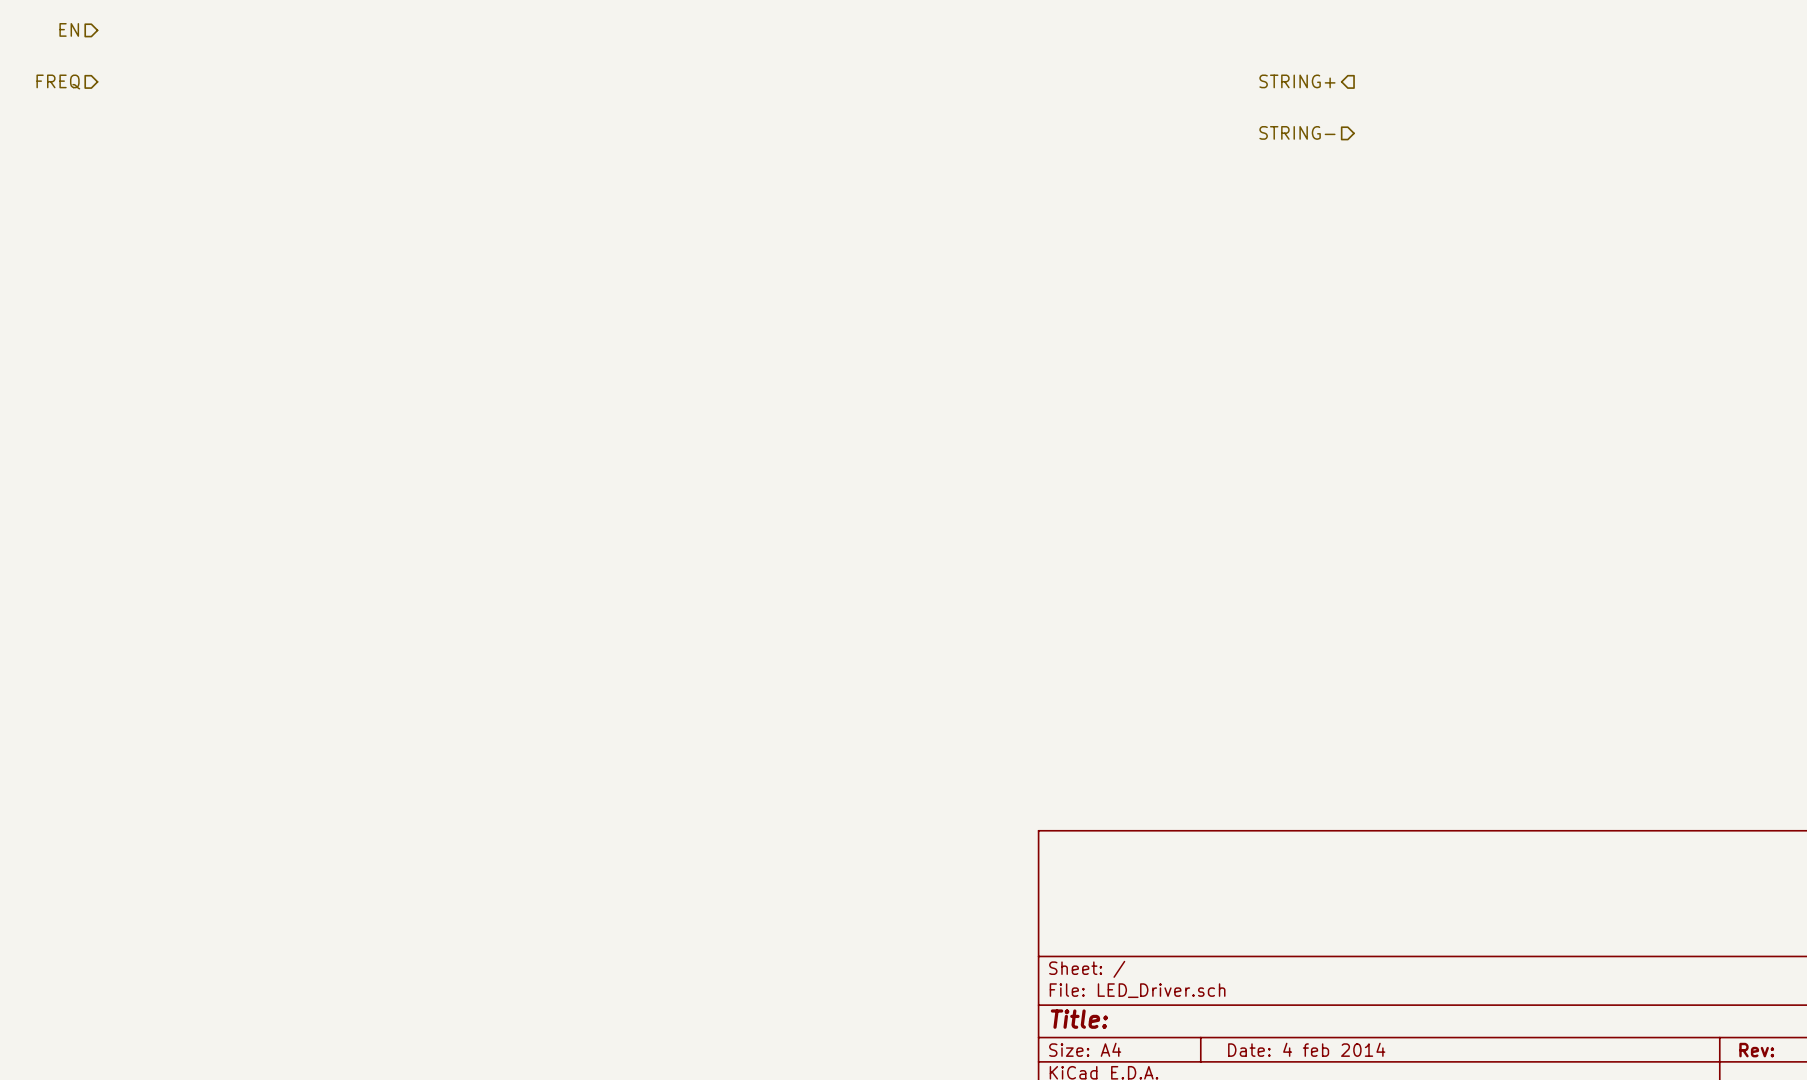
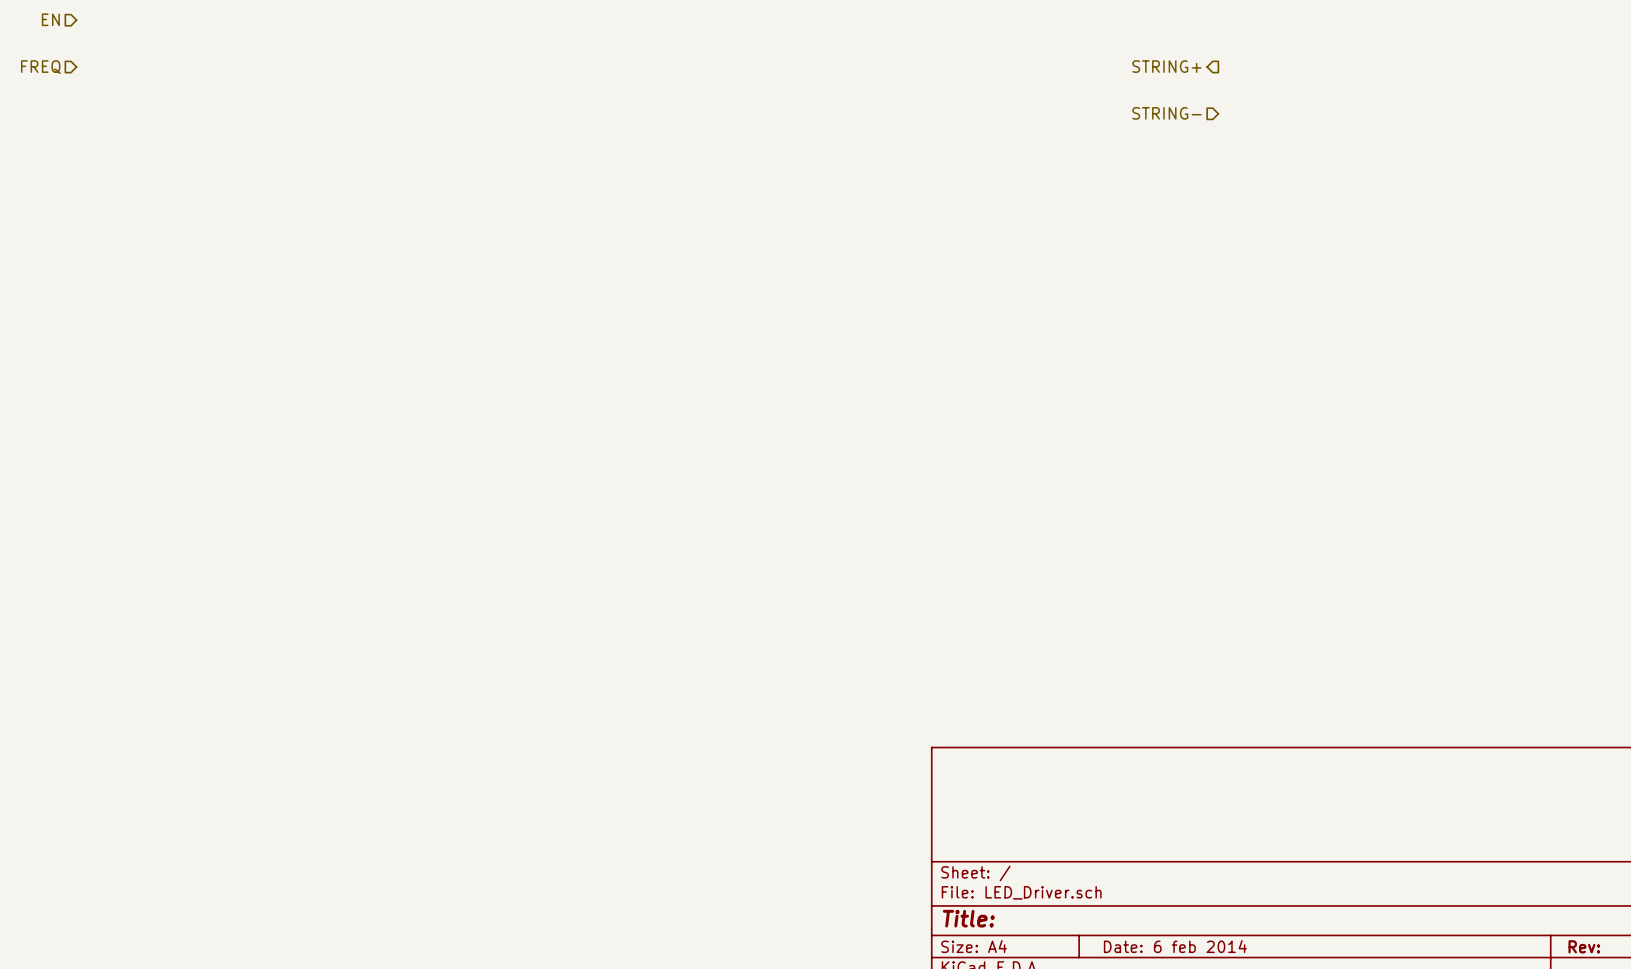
title block: Date: 4 feb 2014 (1306, 1049) -> Date: 6 feb 2014 (1175, 946)

